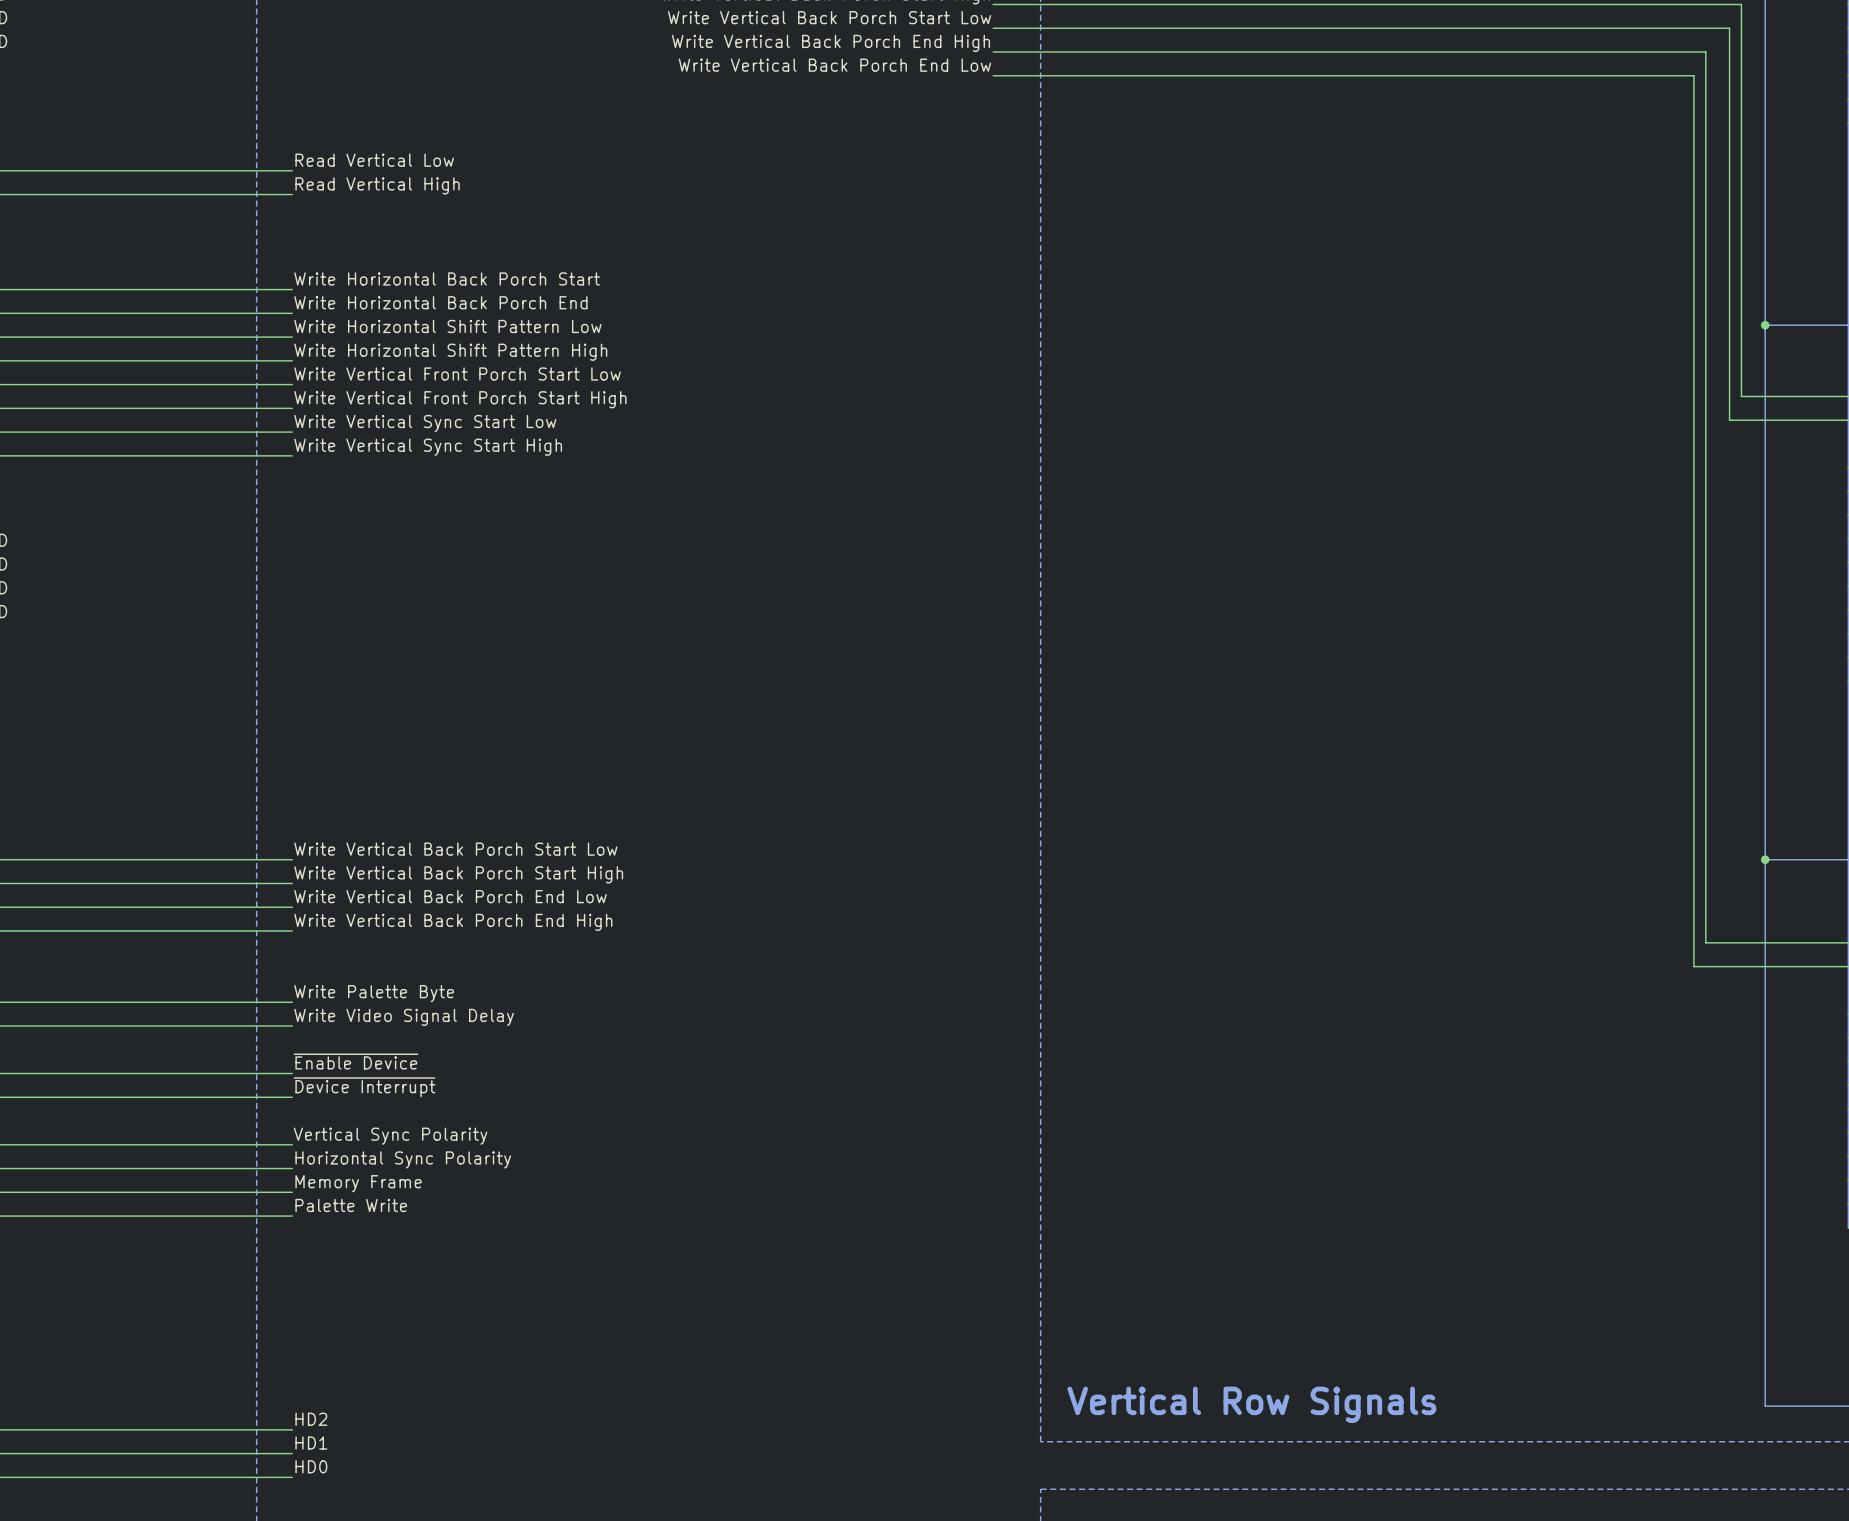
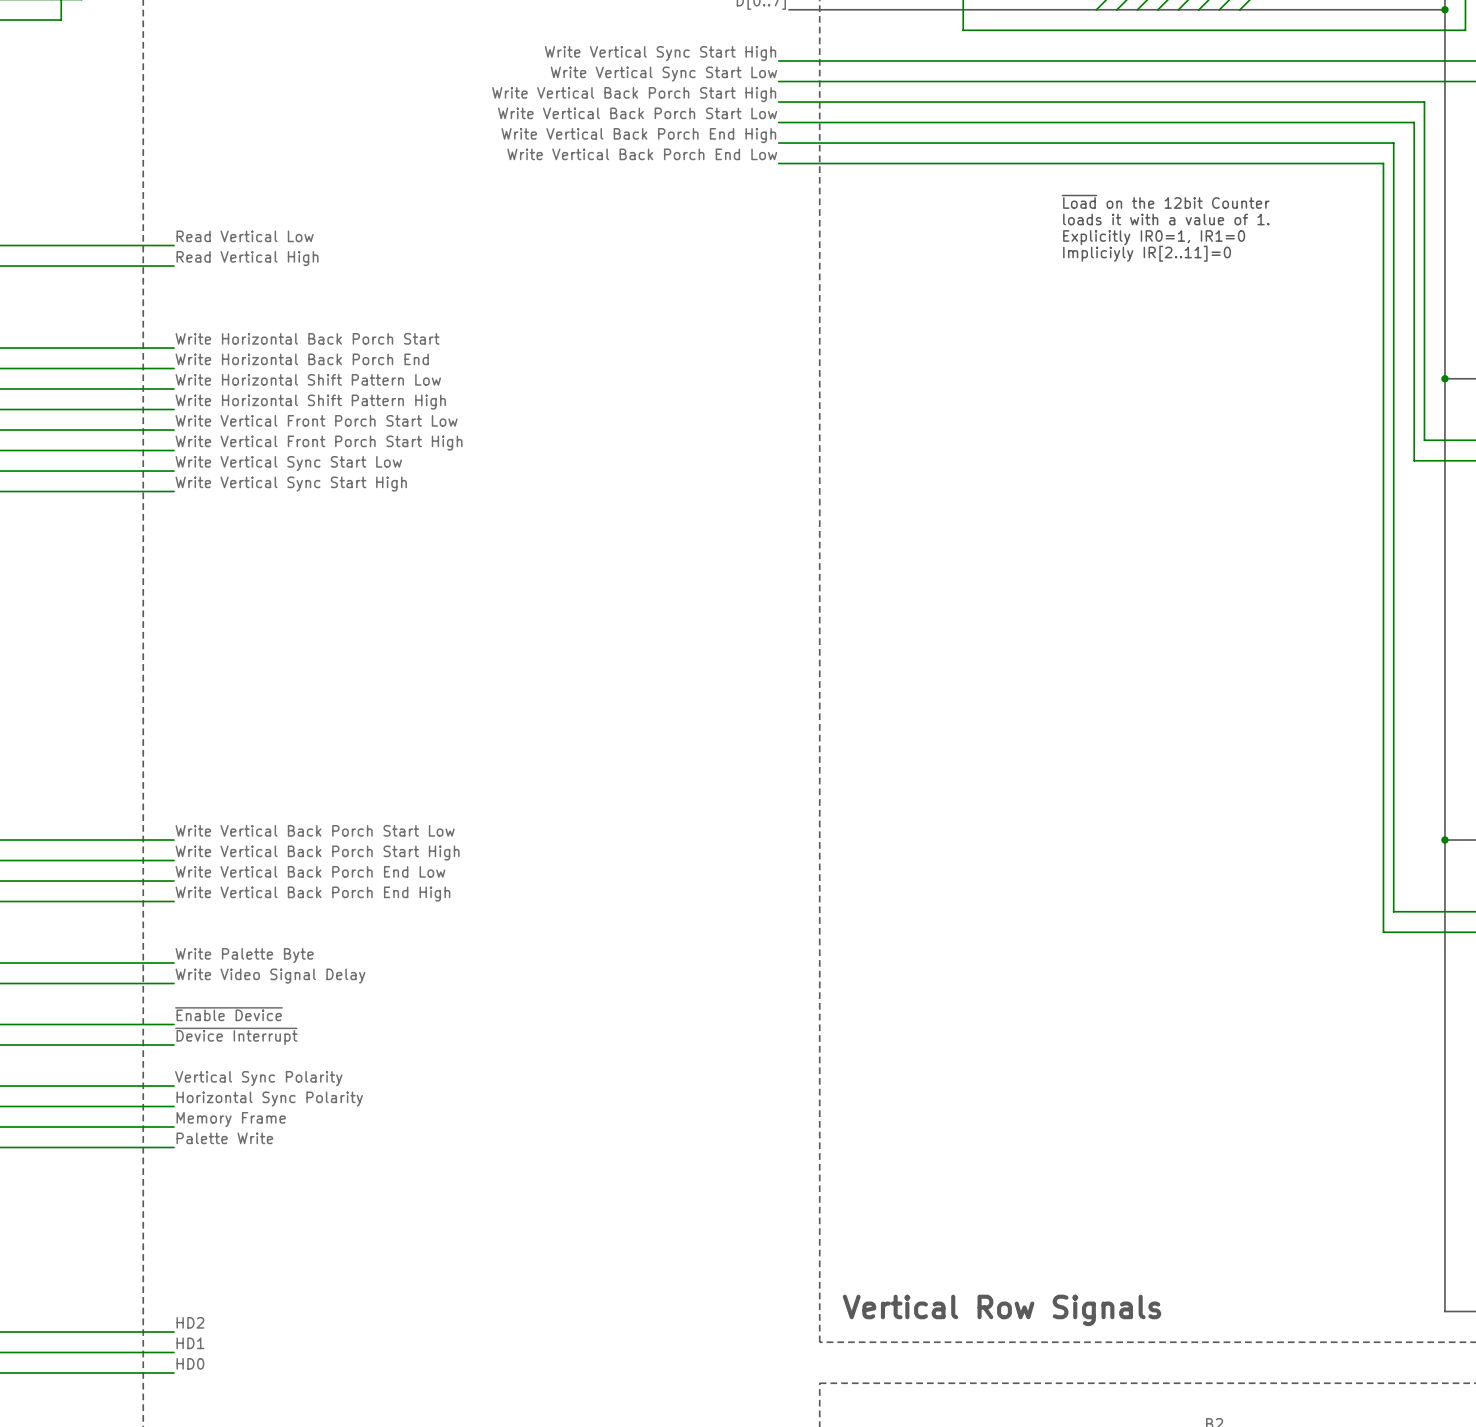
text: none -> ~{Load} on the 12bit Counter (1165, 201)
text: none -> loads it with a value of 1. (1166, 219)
text: none -> Explicitly IR0=1, IR1=0 (1154, 237)
text: none -> Impliciyly IR[2..11]=0 (1147, 253)

